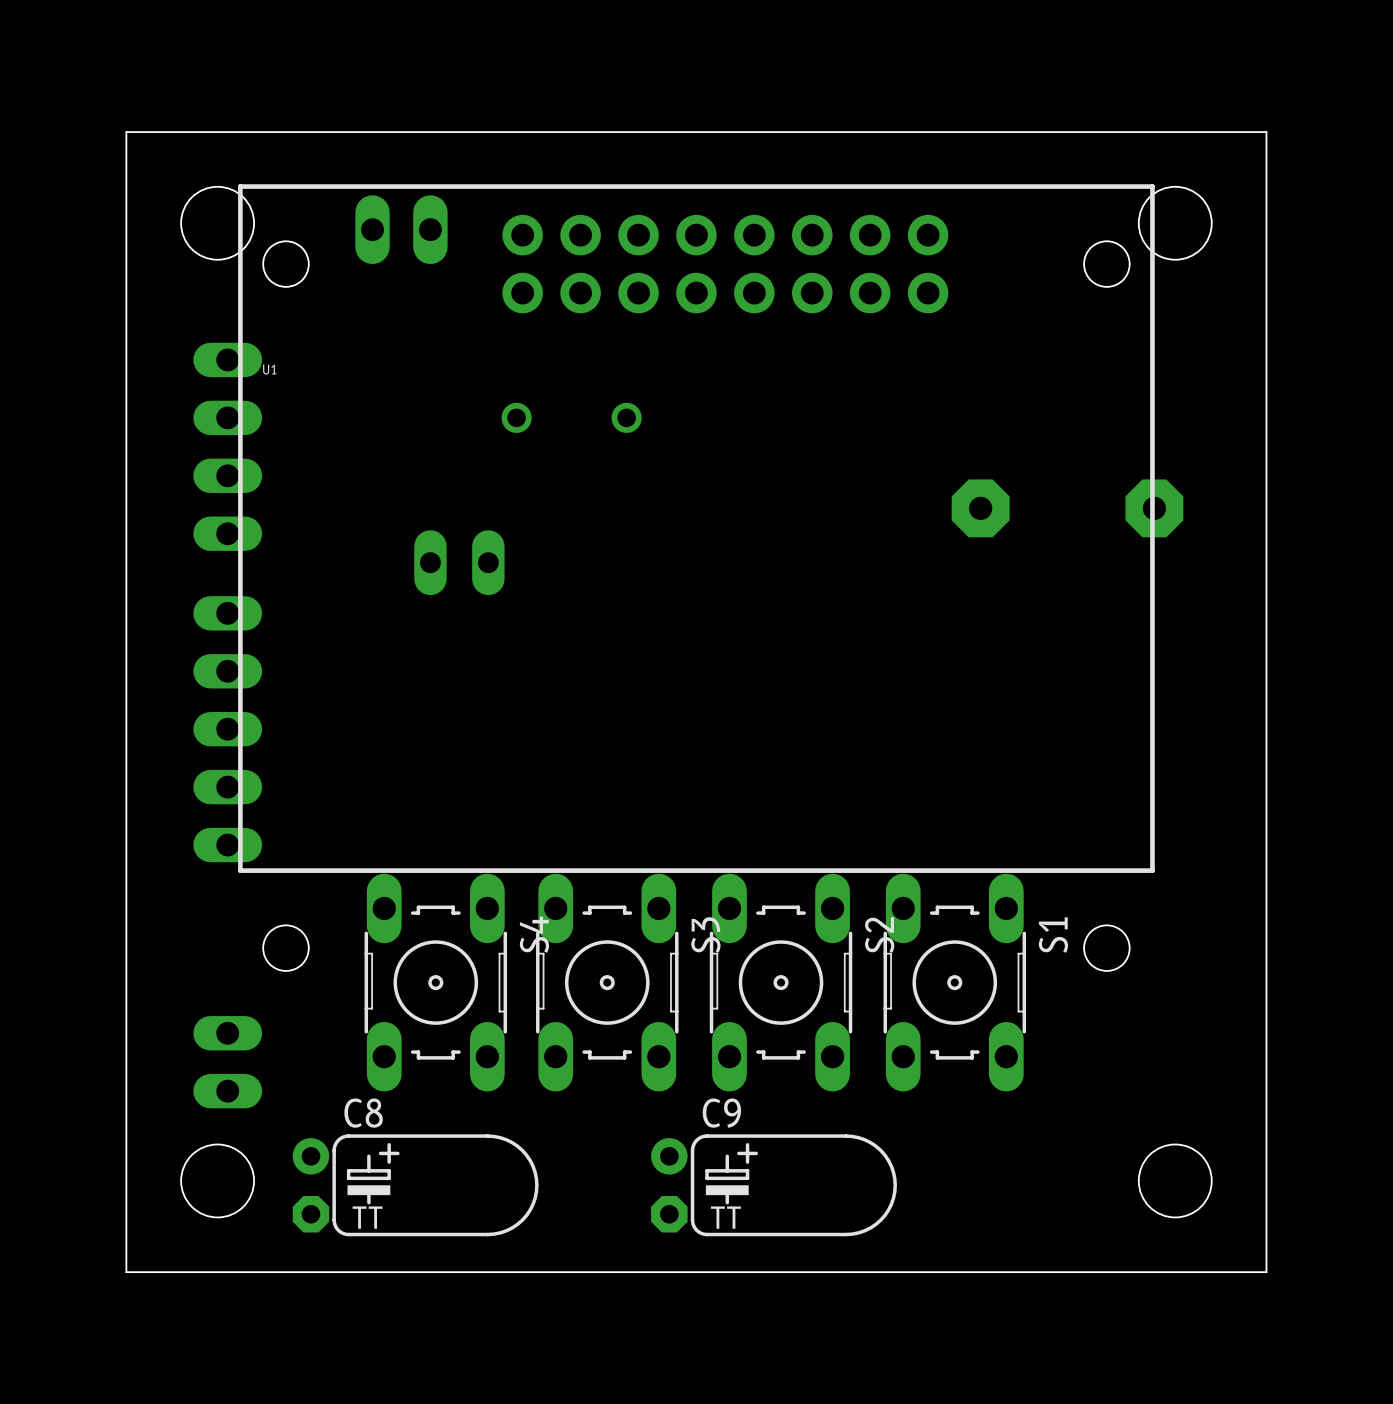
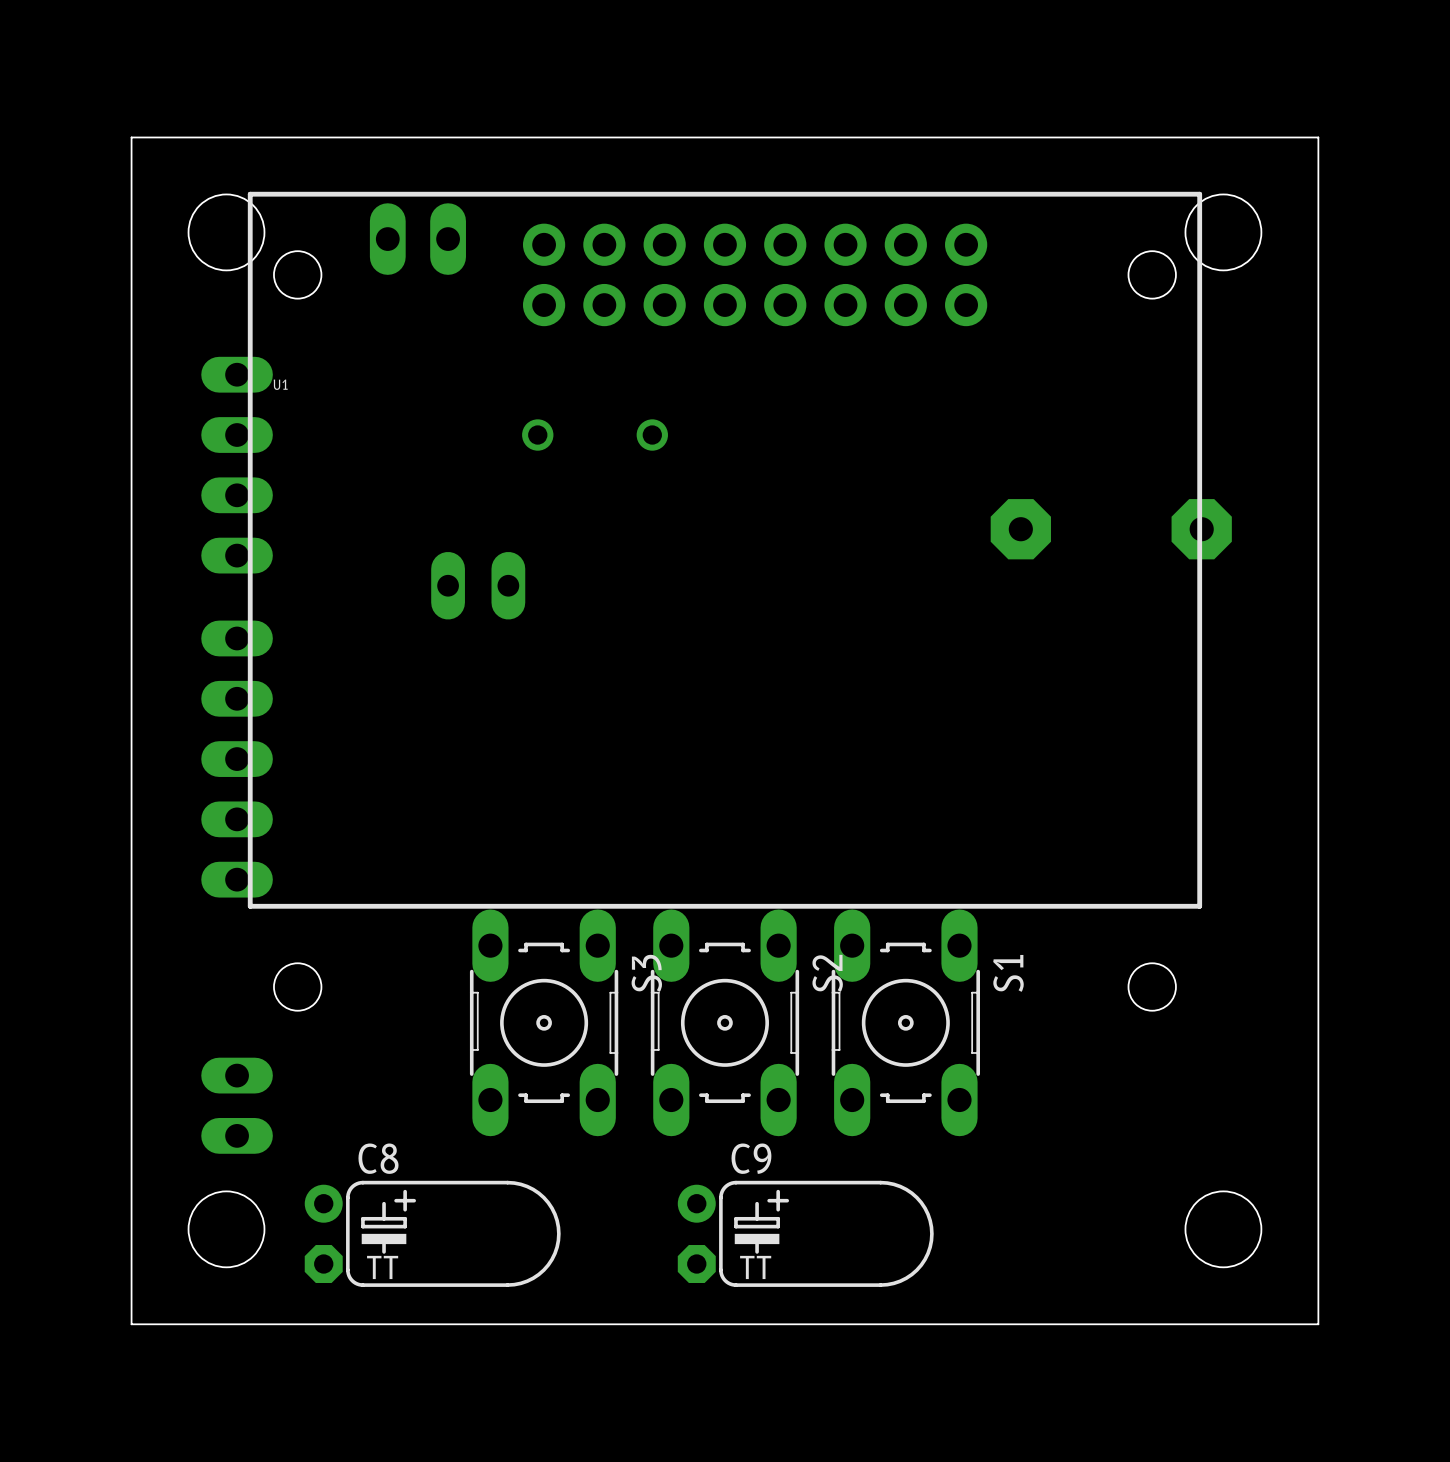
S4: (435, 982) -> none
S3 position: (607, 982) -> (544, 1022)
S2 position: (781, 982) -> (724, 1022)
S1 position: (954, 982) -> (905, 1022)

